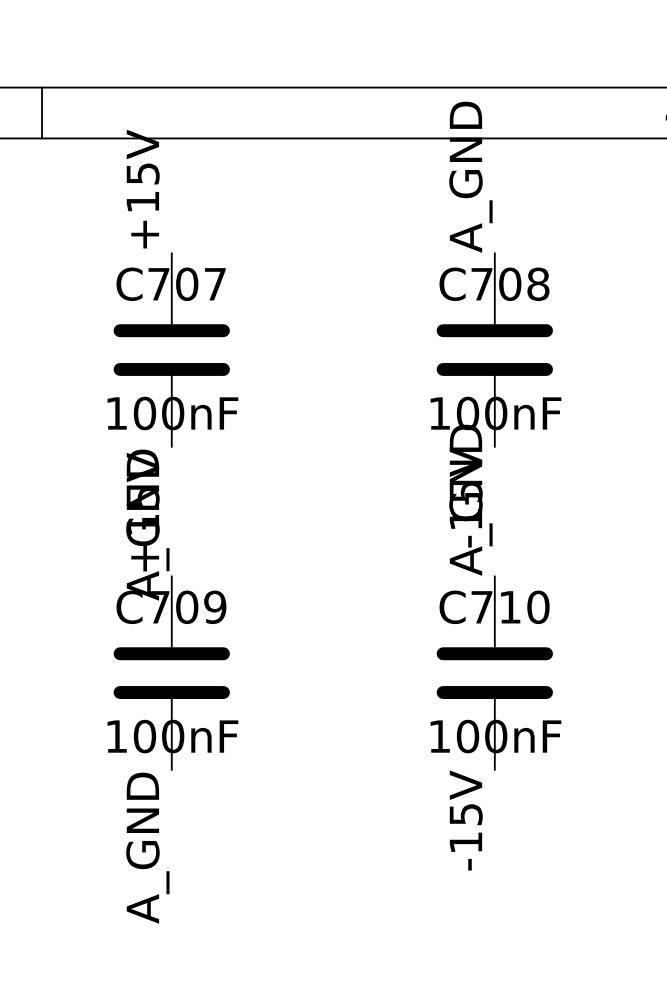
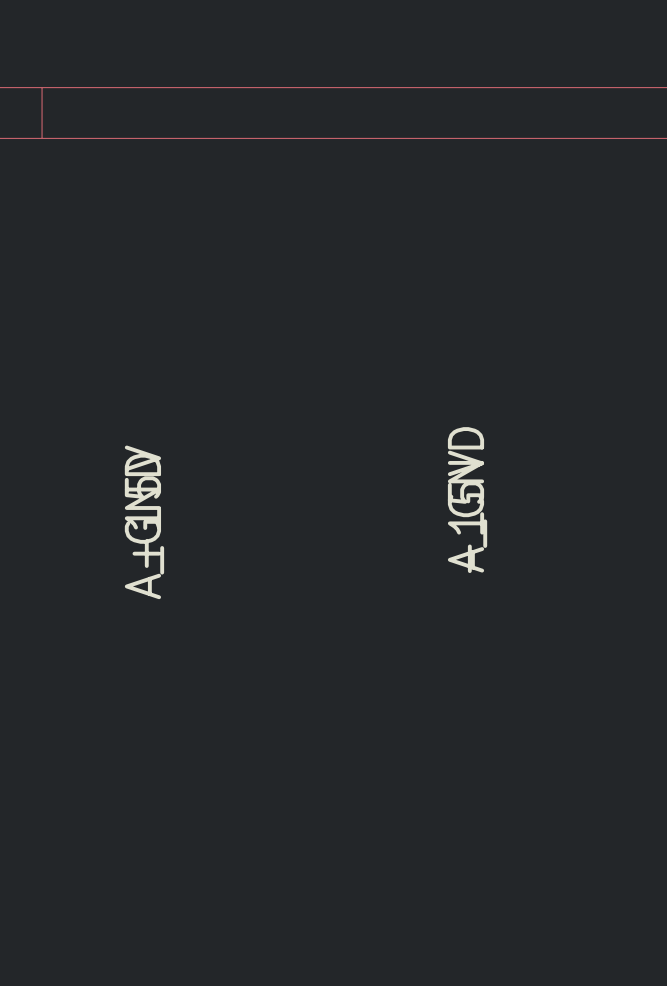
label: A_GND (470, 177) -> none
label: +15V (143, 189) -> none
C707: 100nF (171, 350) -> none
C708: 100nF (494, 350) -> none
C709: 100nF (171, 673) -> none
C710: 100nF (494, 673) -> none
label: -15V (466, 820) -> none
label: A_GND (147, 848) -> none

